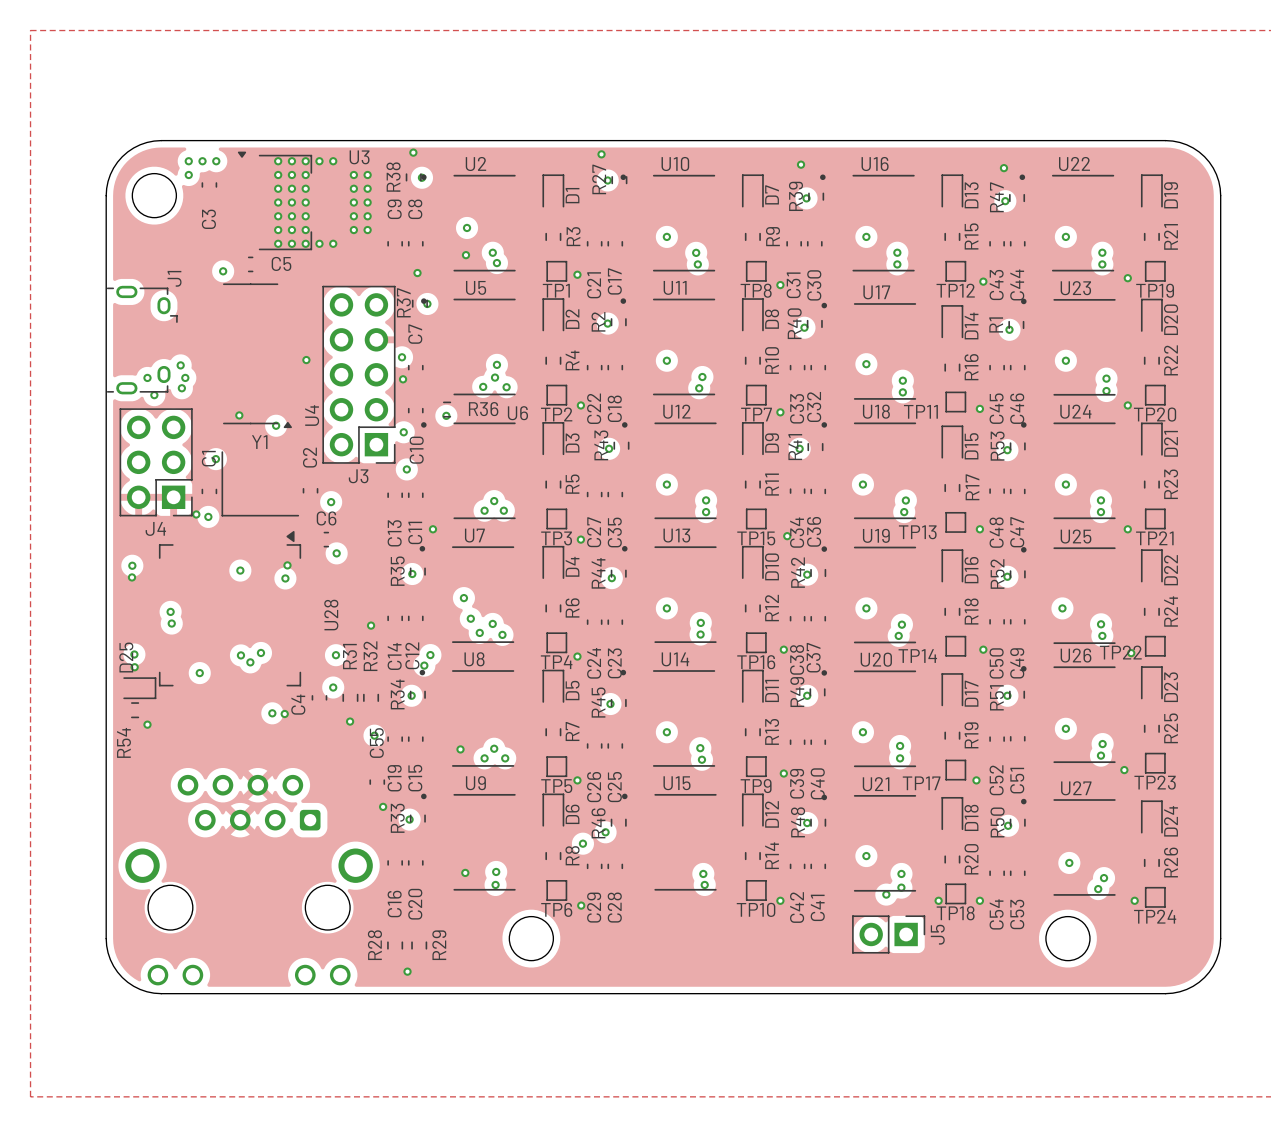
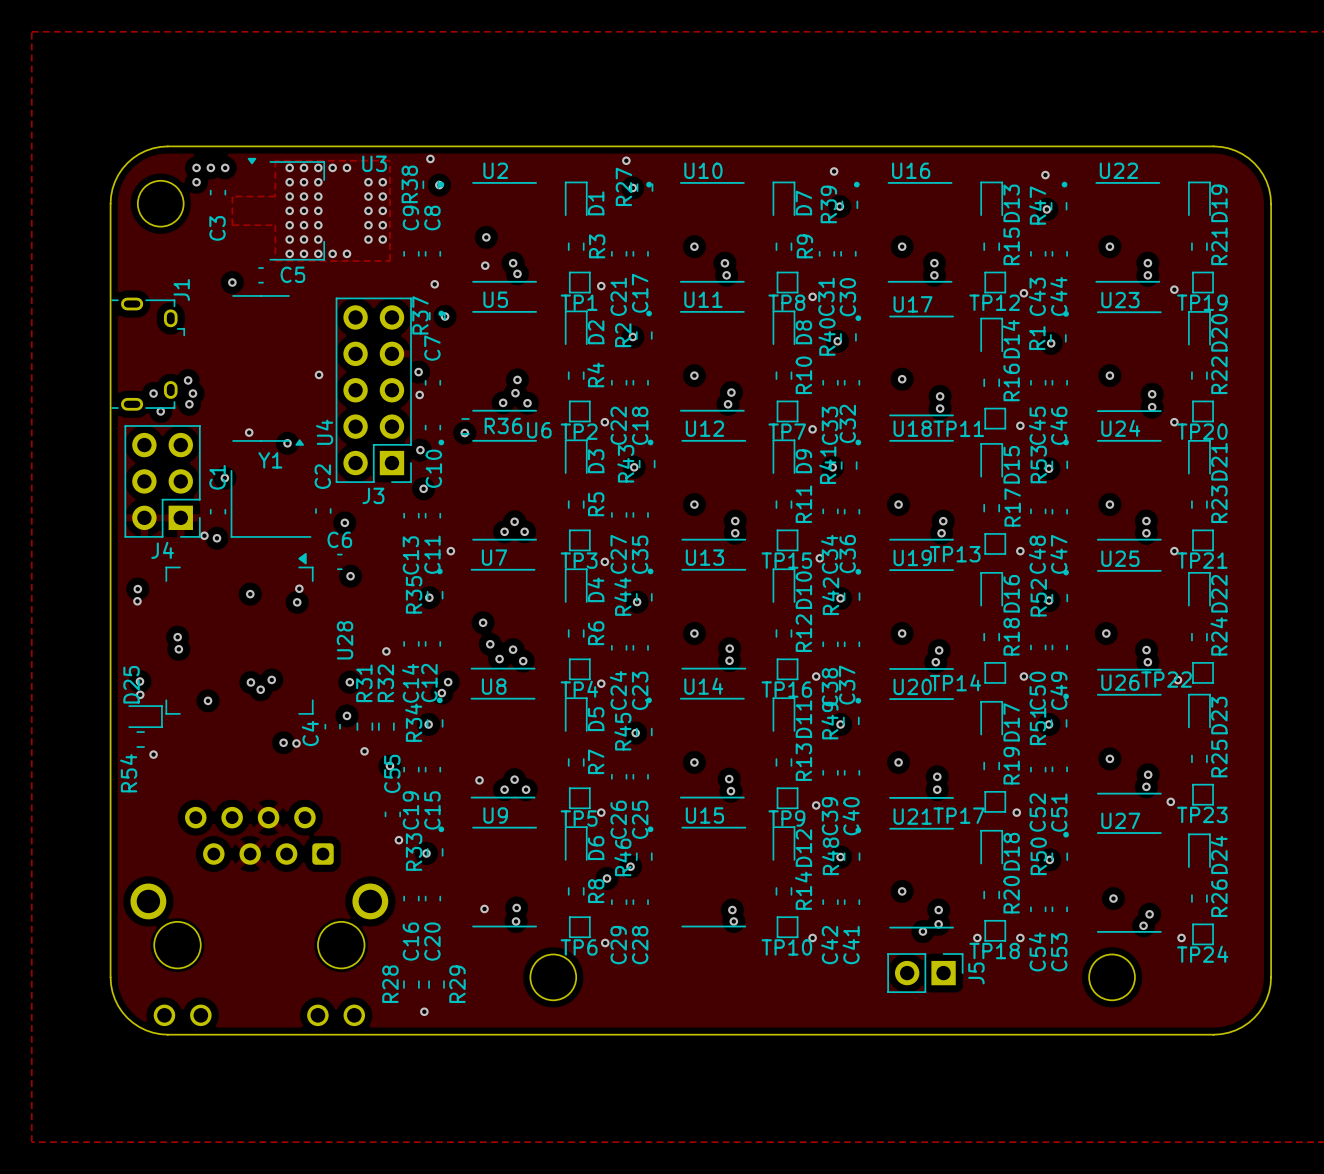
zone outline: none -> (275, 160) (275, 196) (232, 196) (232, 225) (275, 225) (275, 261) (389, 261) (389, 160) (275, 160)

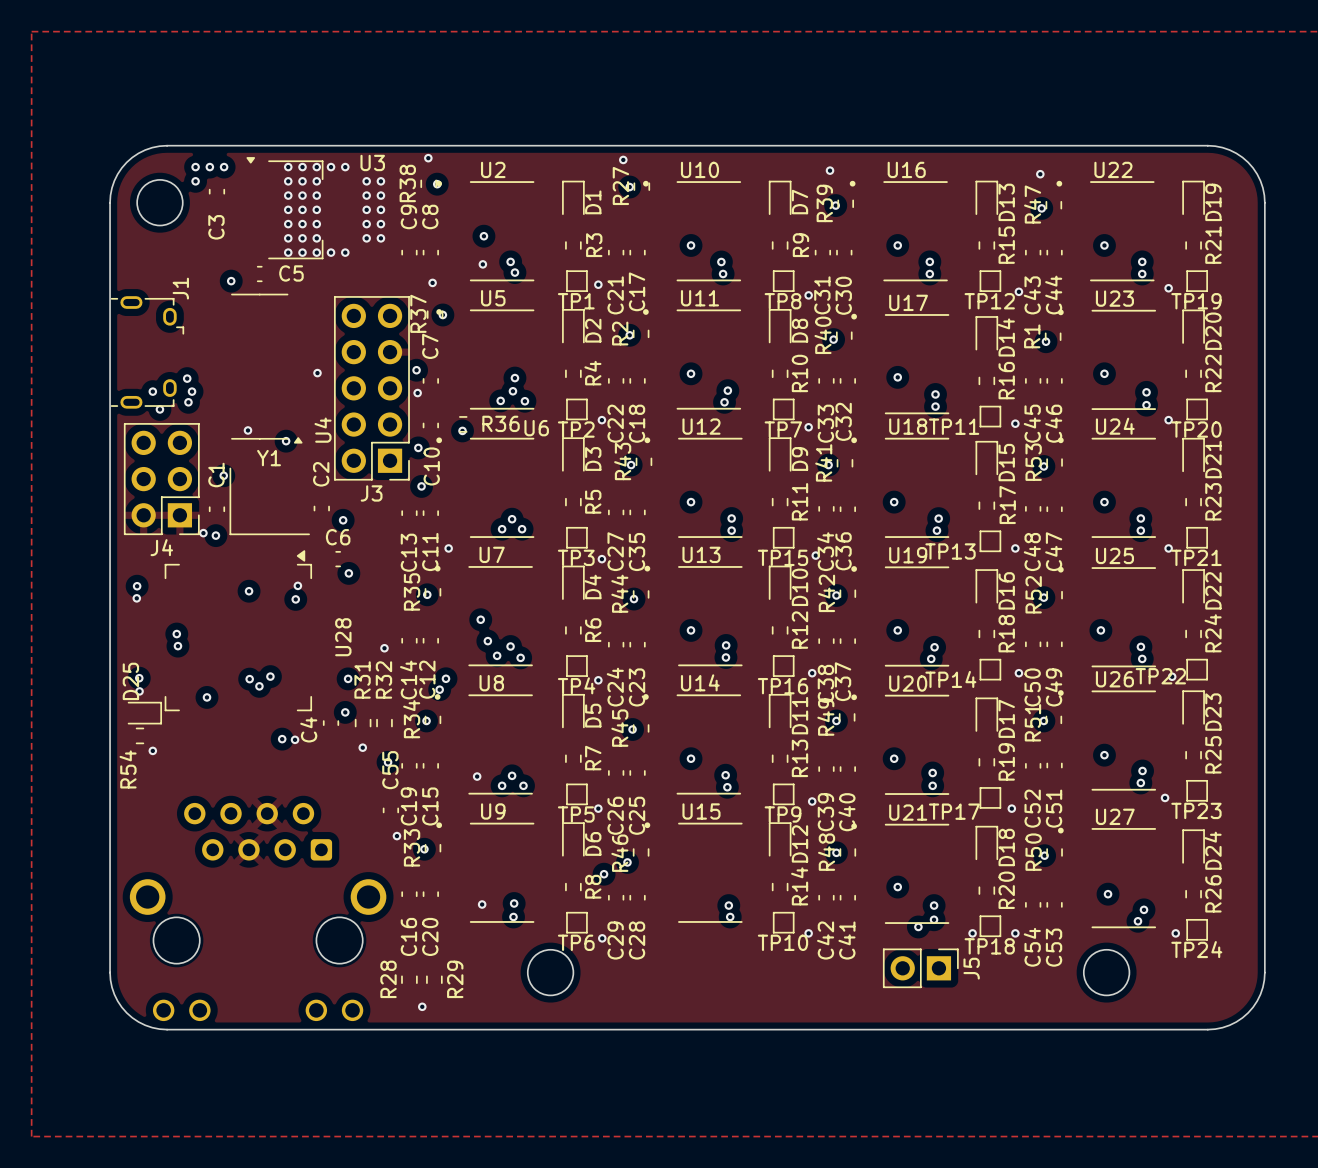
zone outline: (275, 160) (275, 196) (232, 196) (232, 225) (275, 225) (275, 261) (389, 261) (389, 160) (275, 160) -> none

